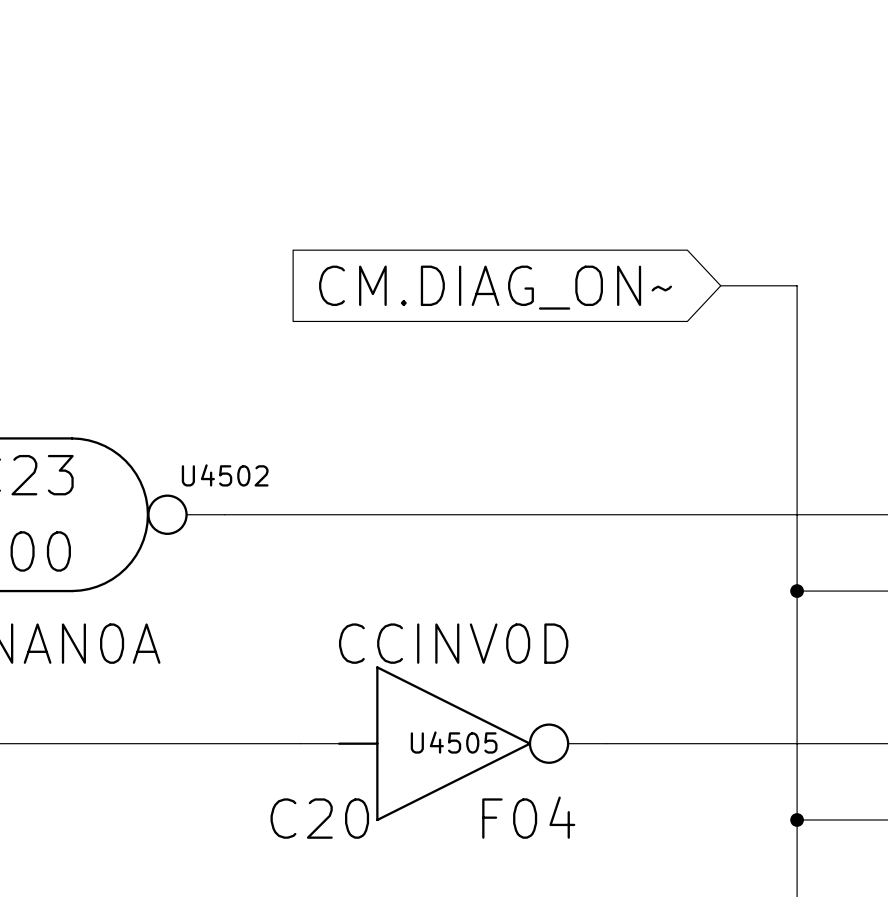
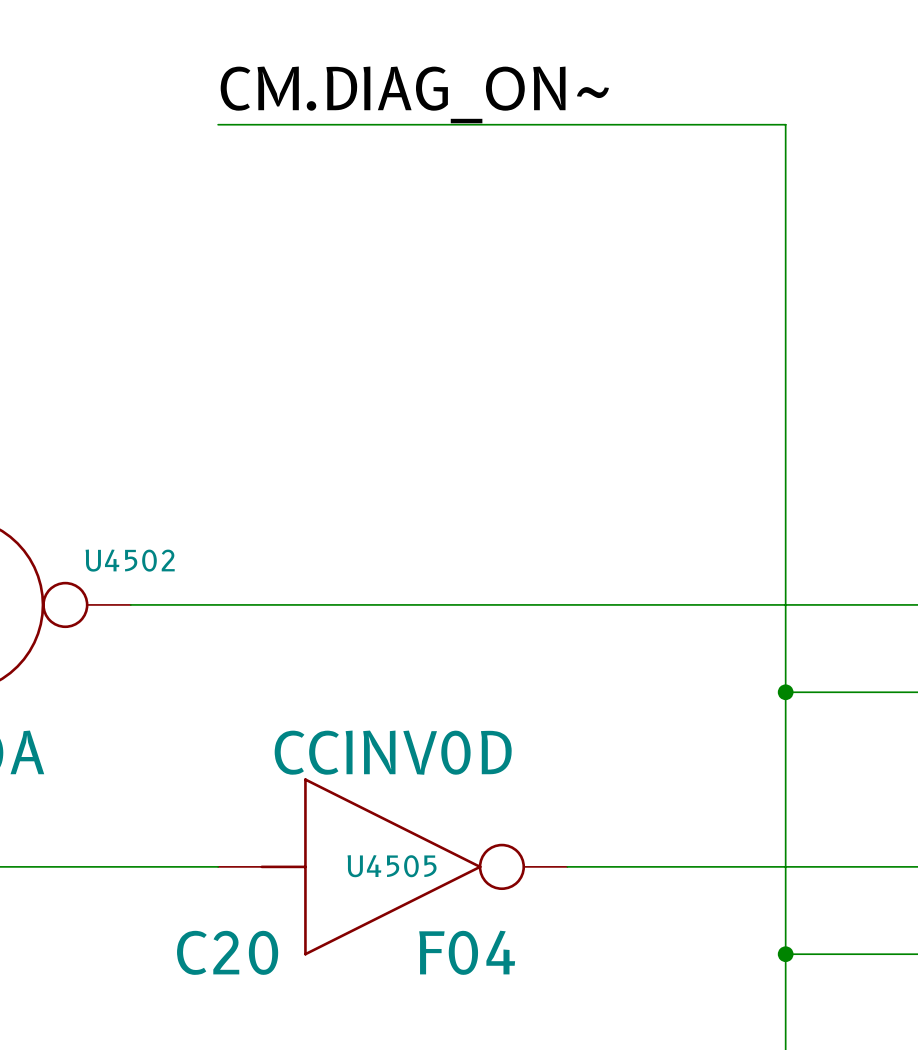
label: none -> CM.DIAG_ON~ (414, 94)
wire: (720, 285) (797, 285) -> (218, 124) (785, 124) (785, 343)
global label: CM.DIAG_ON~ (495, 287) -> none

